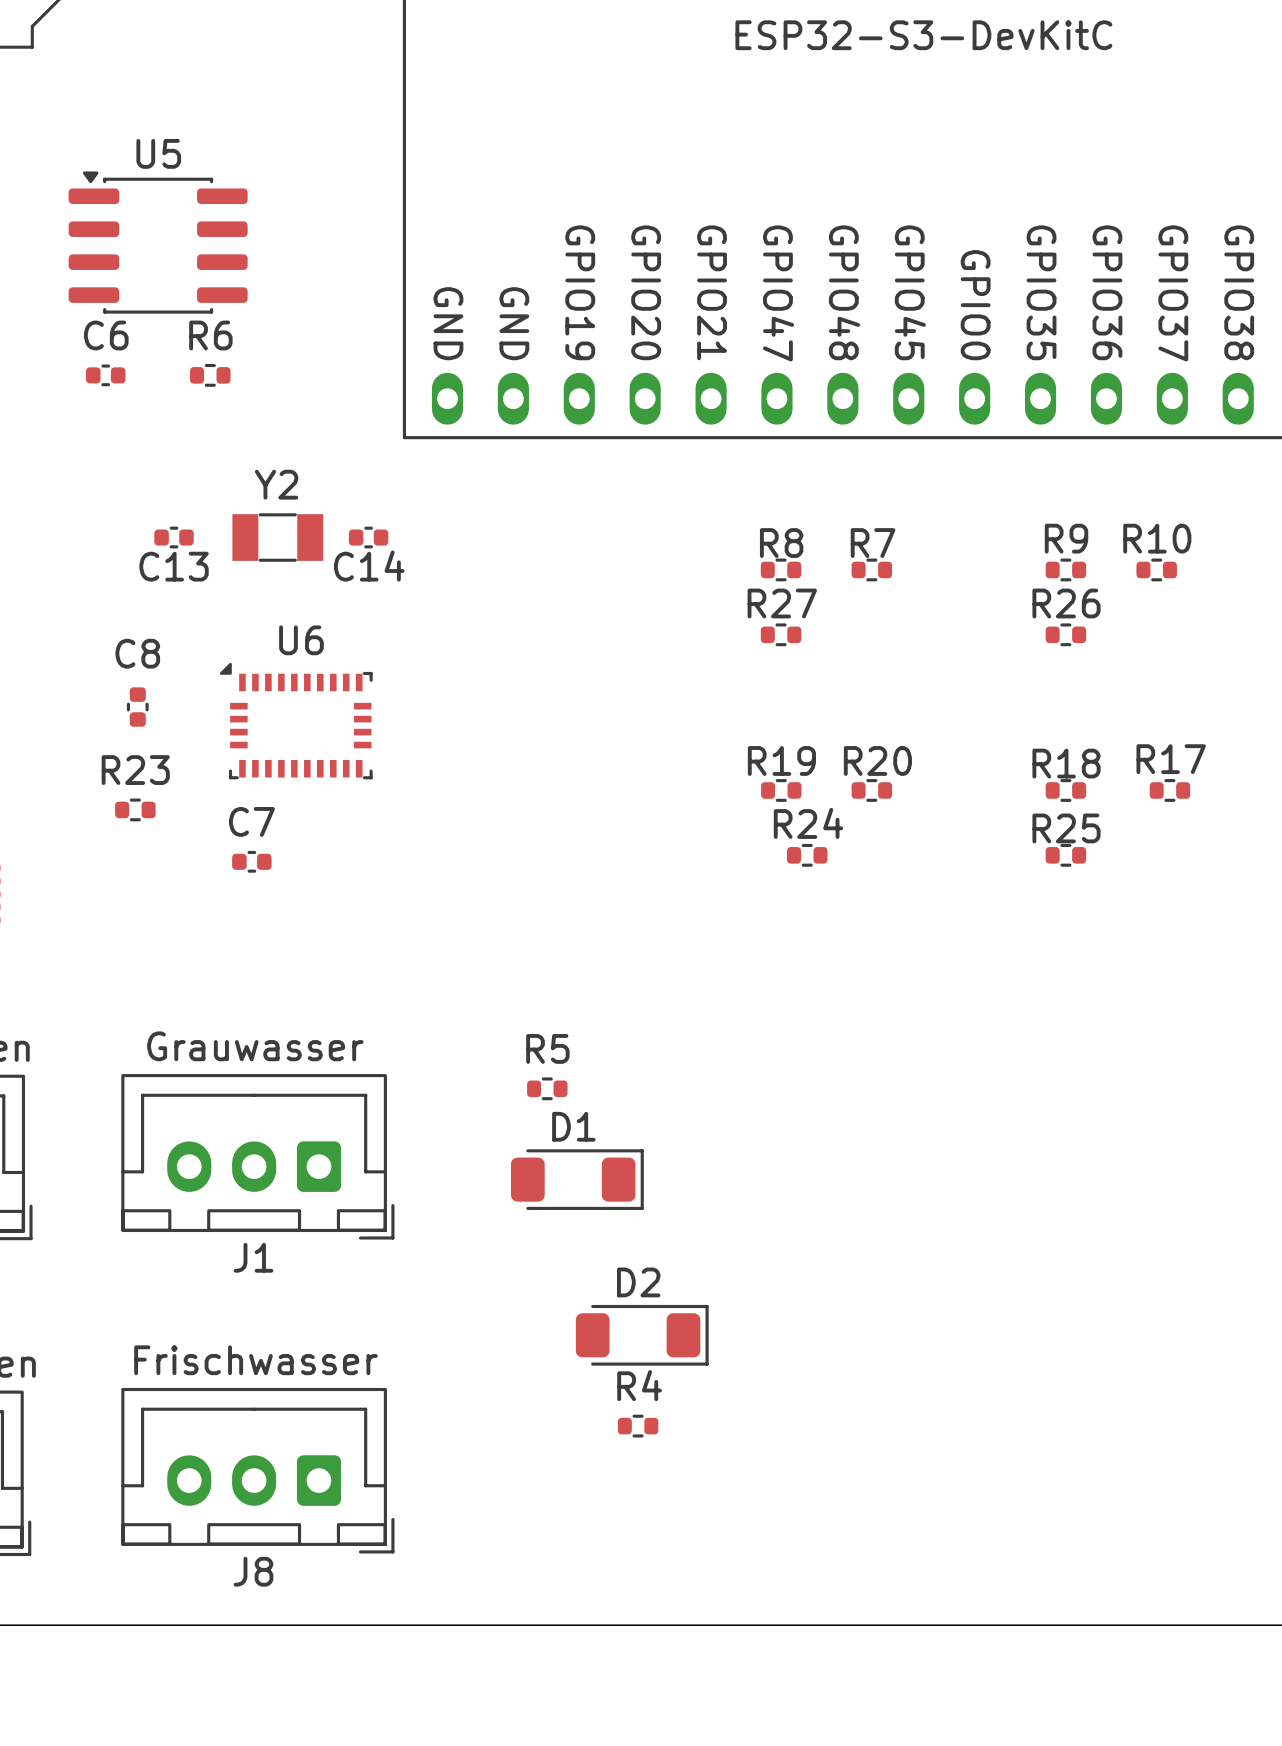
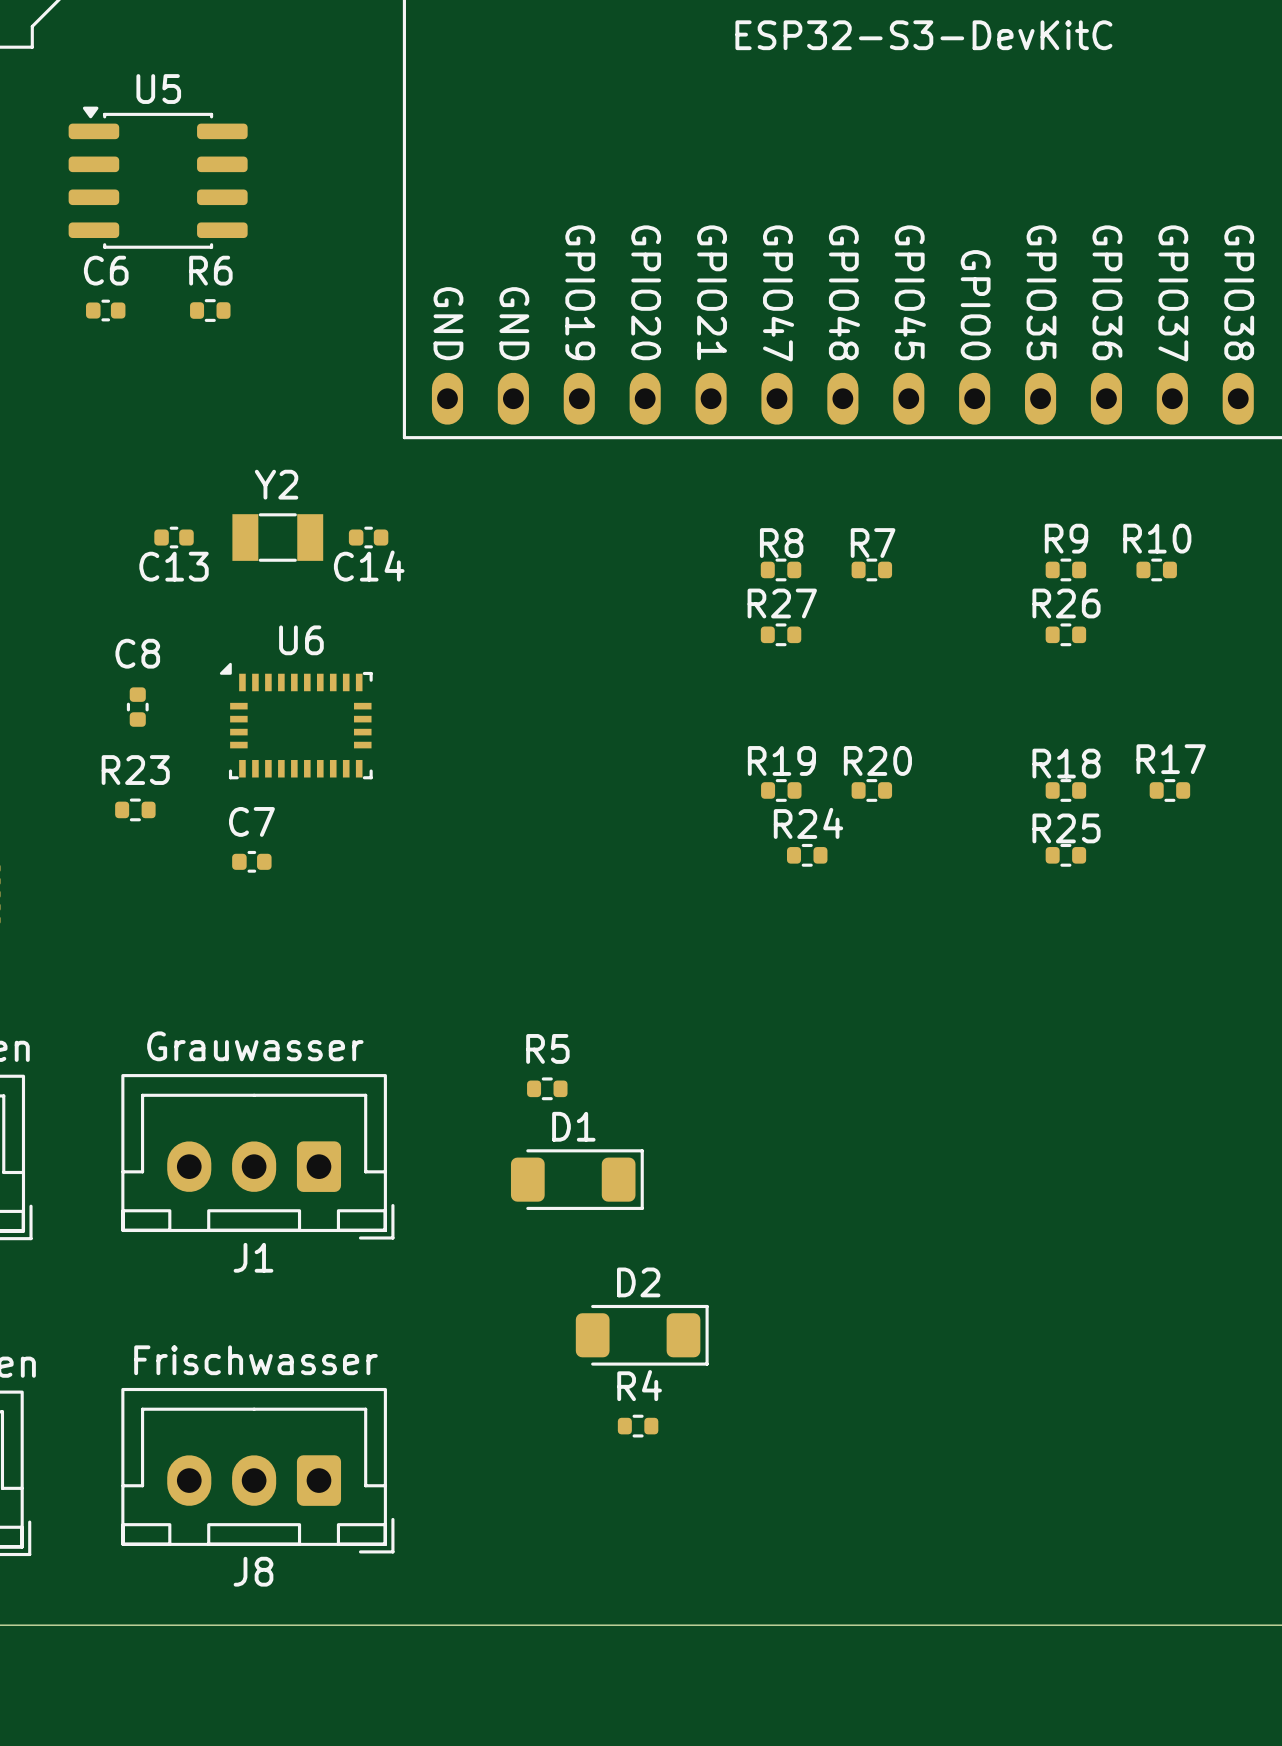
U5 position: (158, 242) -> (158, 177)
C6 position: (105, 375) -> (105, 310)
R6 position: (210, 375) -> (210, 310)

